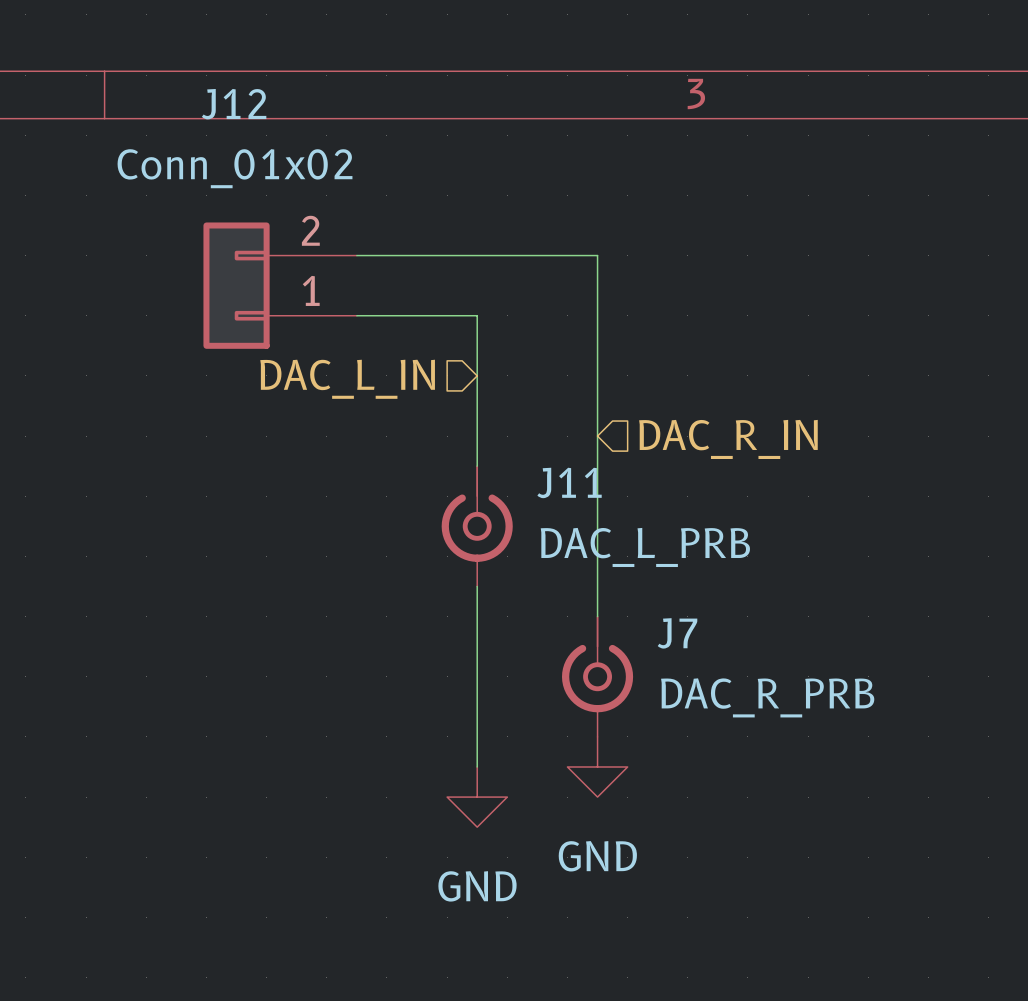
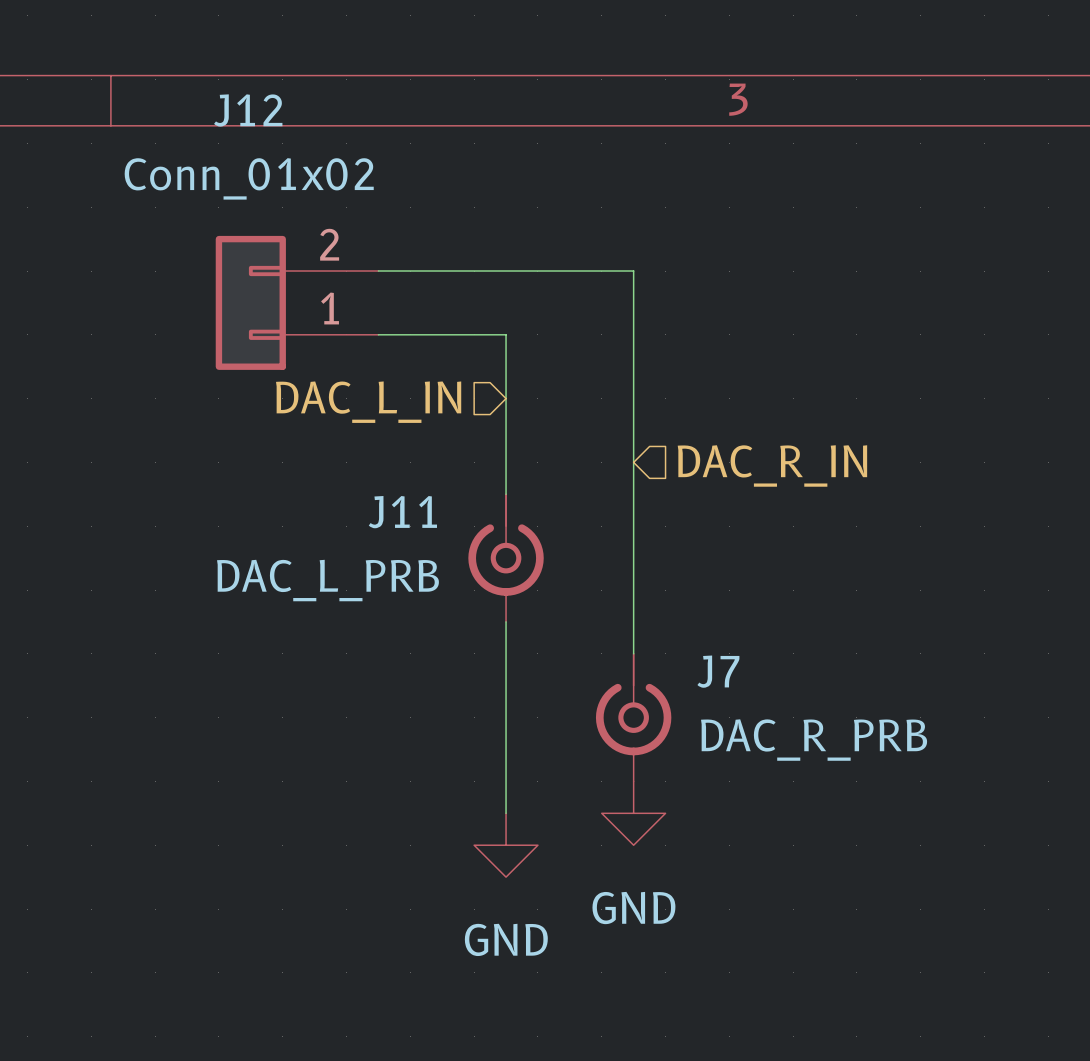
J11 name position: J11 (569, 482) -> J11 (402, 512)
J11 value position: DAC_L_PRB (645, 547) -> DAC_L_PRB (327, 580)

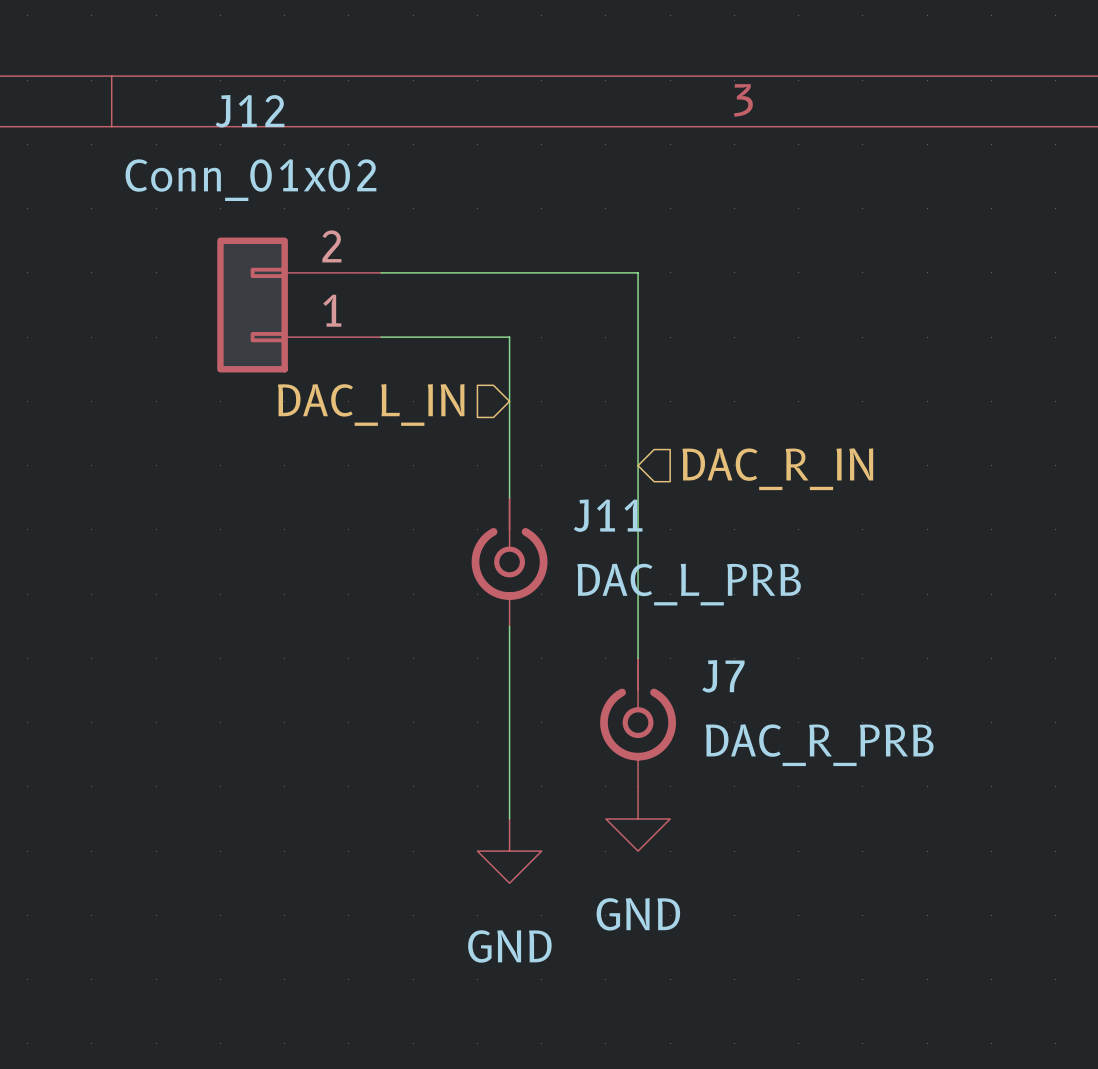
J11 name position: J11 (402, 512) -> J11 (608, 515)
J11 value position: DAC_L_PRB (327, 580) -> DAC_L_PRB (689, 584)

